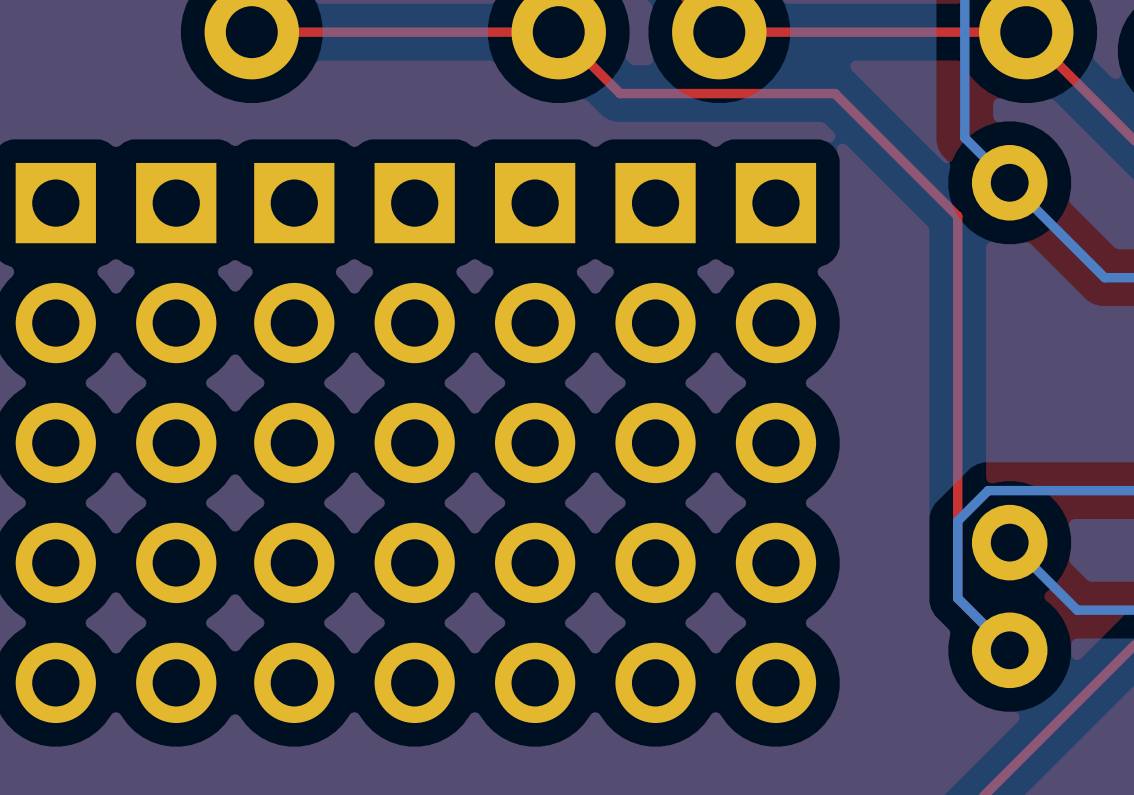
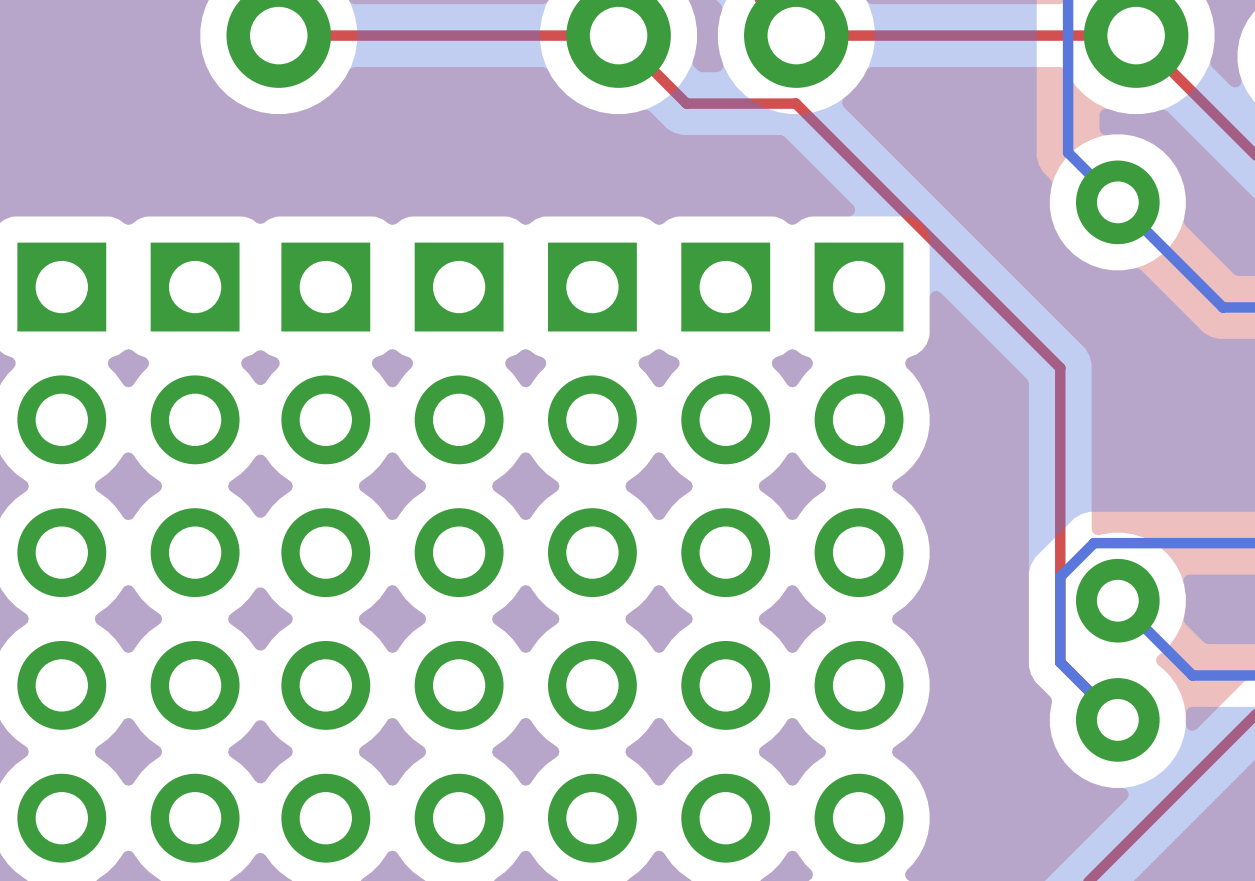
top track: (718, 93) (835, 93) (957, 216) (957, 332) -> (795, 103) (1060, 367)
part position: (55, 442) -> (61, 552)
part position: (176, 442) -> (195, 552)
part position: (294, 442) -> (325, 552)
part position: (414, 442) -> (459, 552)
part position: (535, 442) -> (592, 552)
part position: (655, 442) -> (725, 552)
part position: (775, 442) -> (859, 552)

